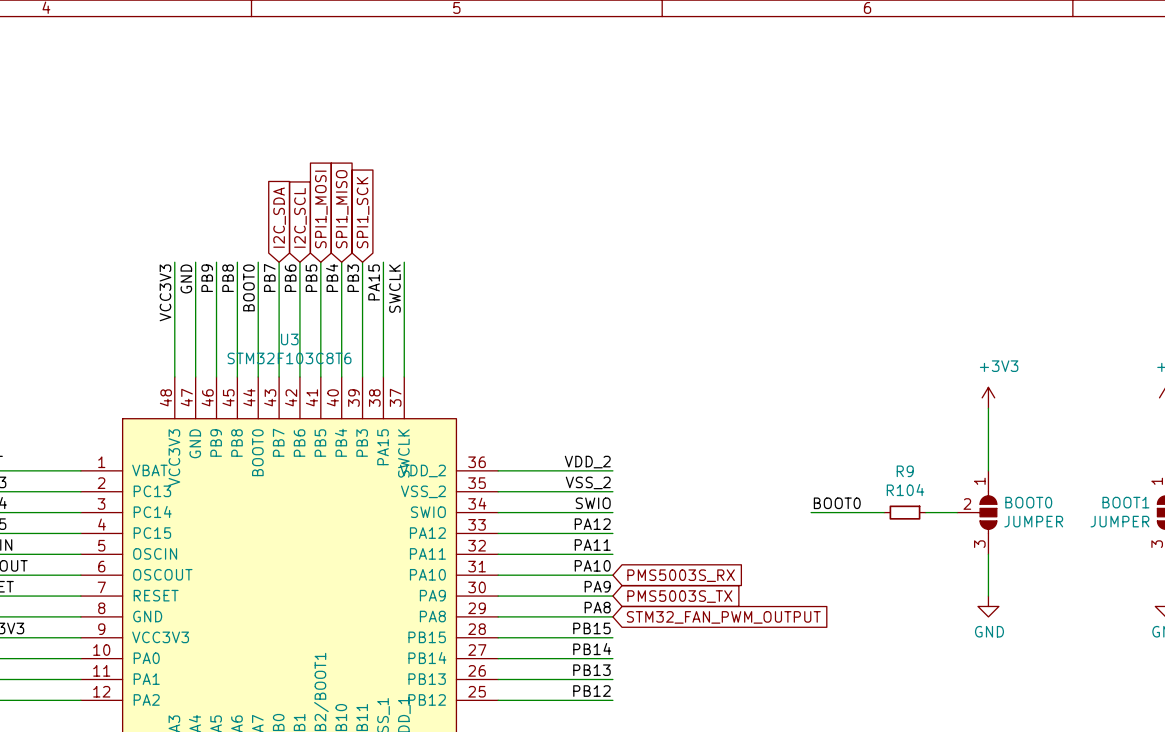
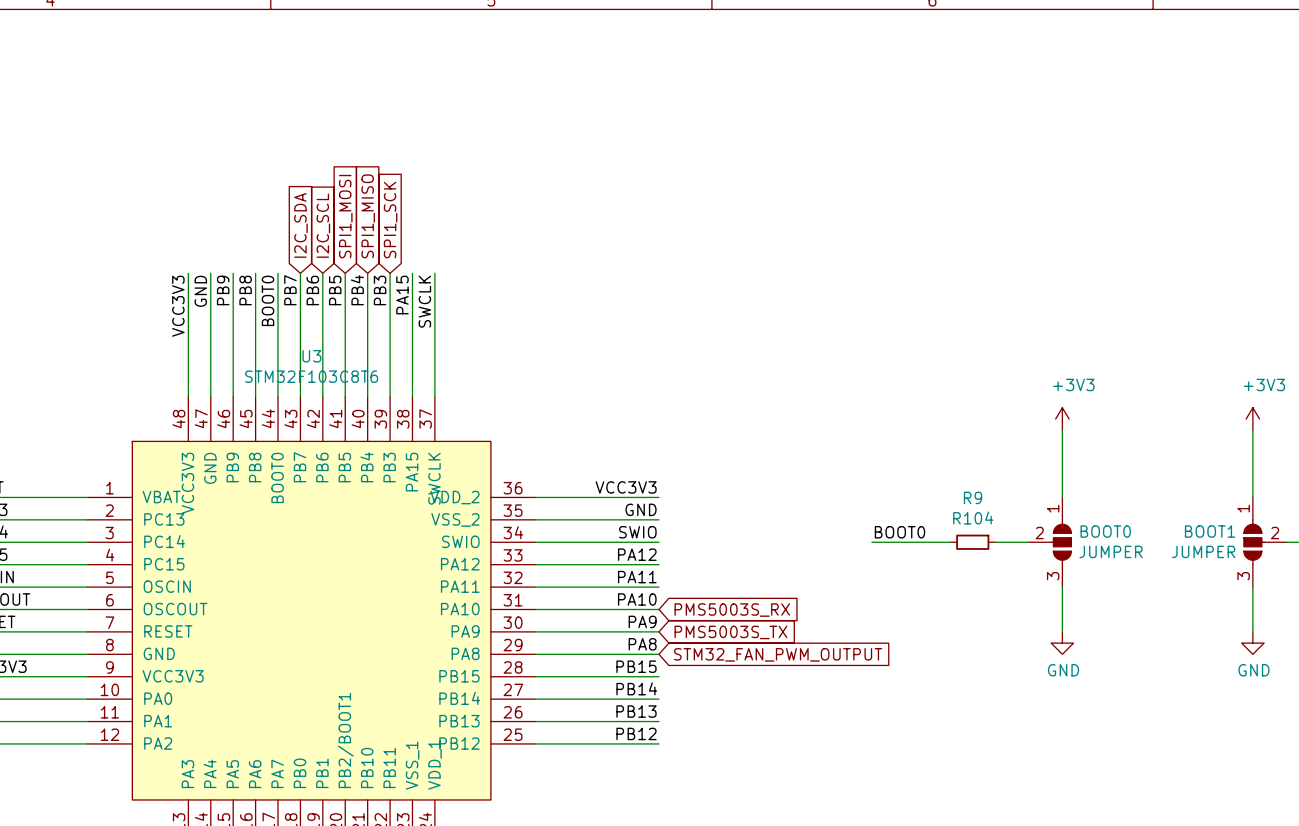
label: VDD_2 (587, 462) -> VCC3V3 (626, 487)
label: VSS_2 (588, 482) -> GND (641, 509)

